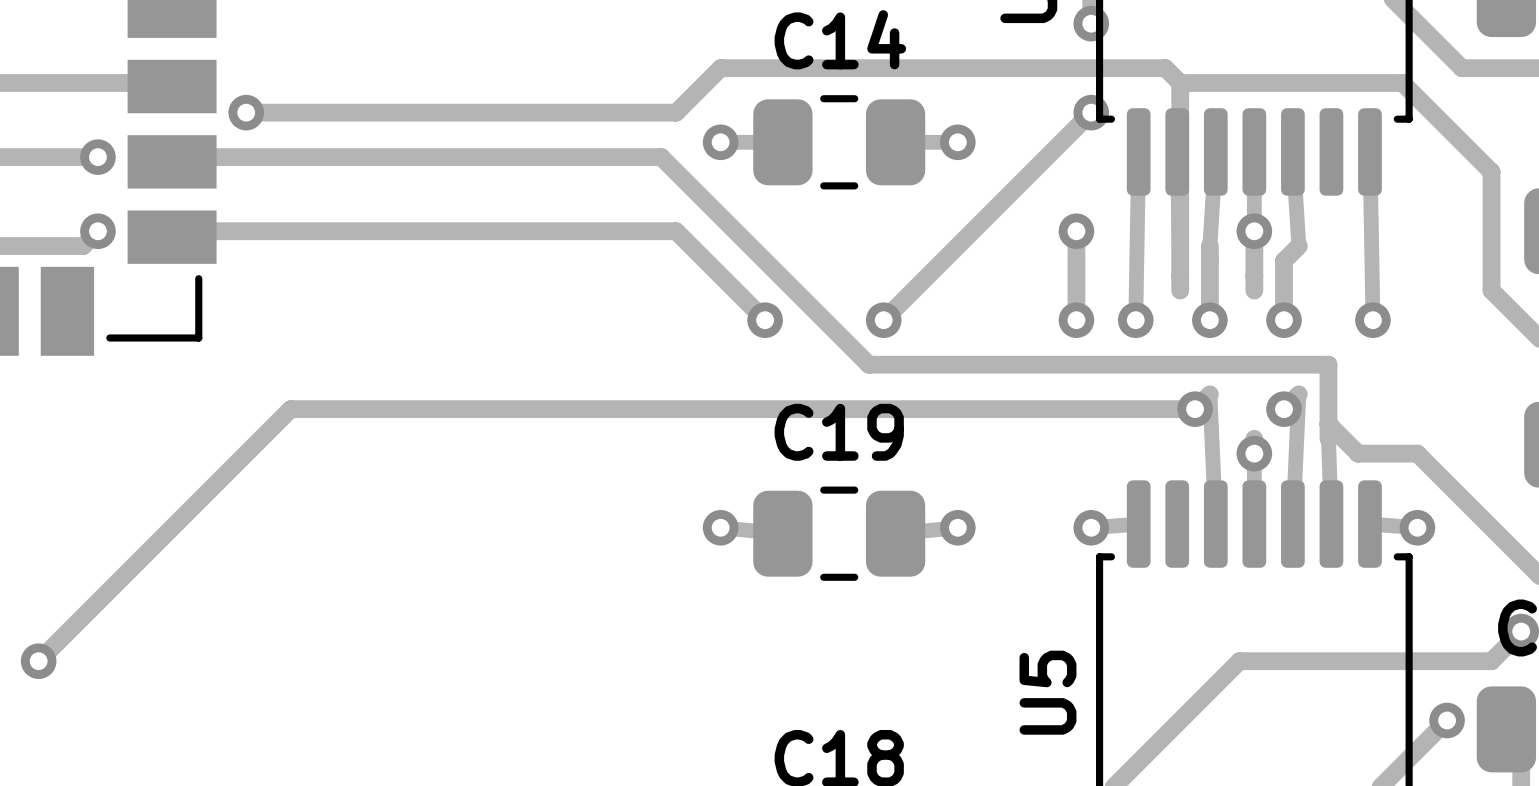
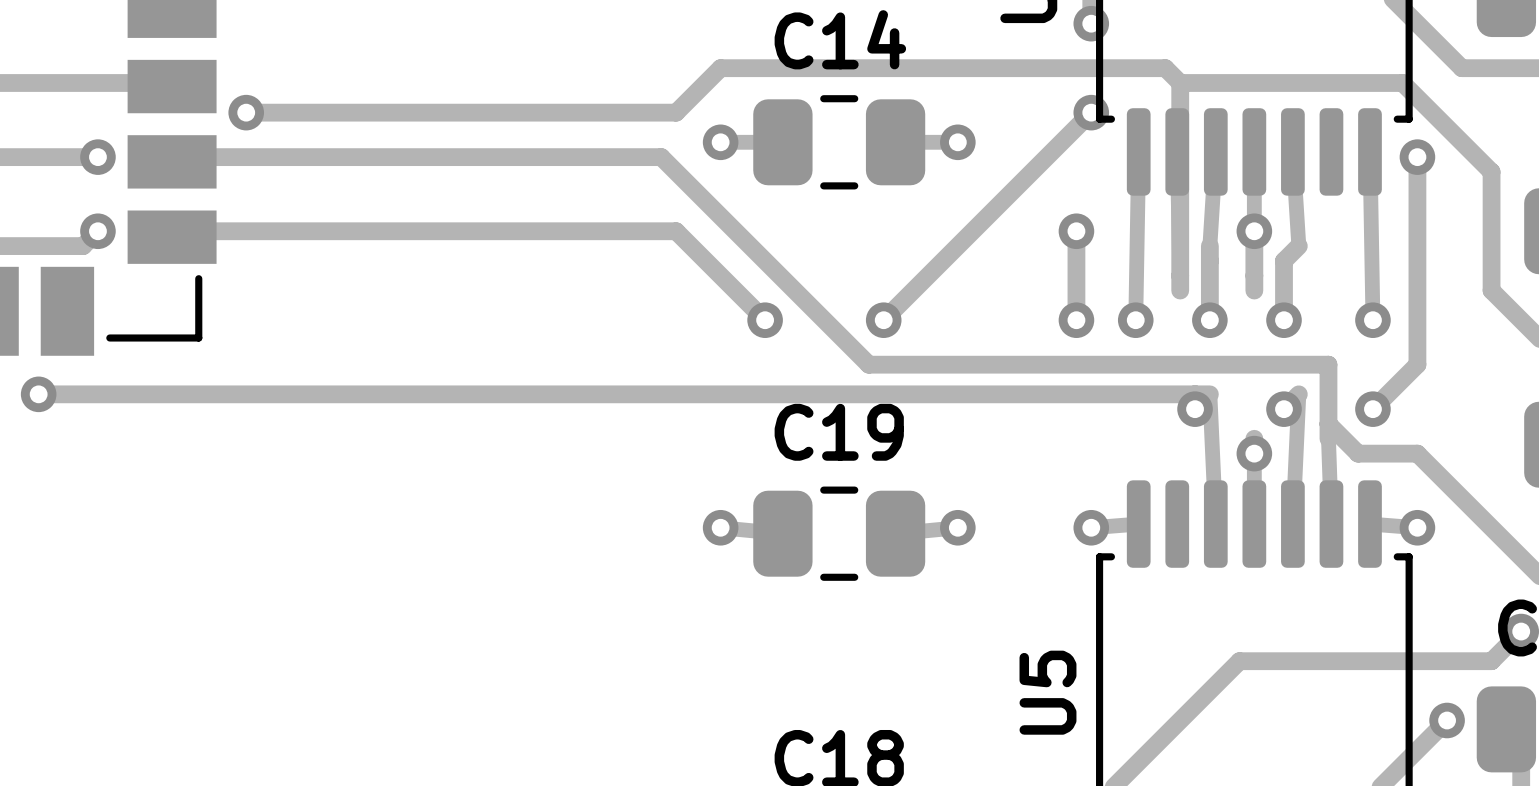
track: none -> (1417, 157) (1417, 364) (1372, 409)
via: none -> (1417, 157)
via: none -> (38, 394)
track: (1209, 394) (1195, 409) (290, 409) (38, 661) -> (1209, 394) (38, 394)
via: none -> (1372, 409)
via: (38, 661) -> none

